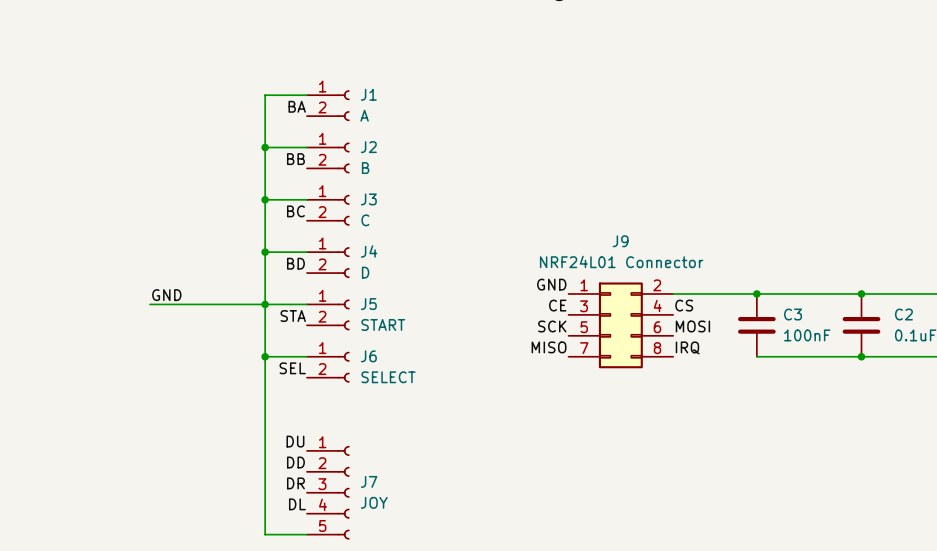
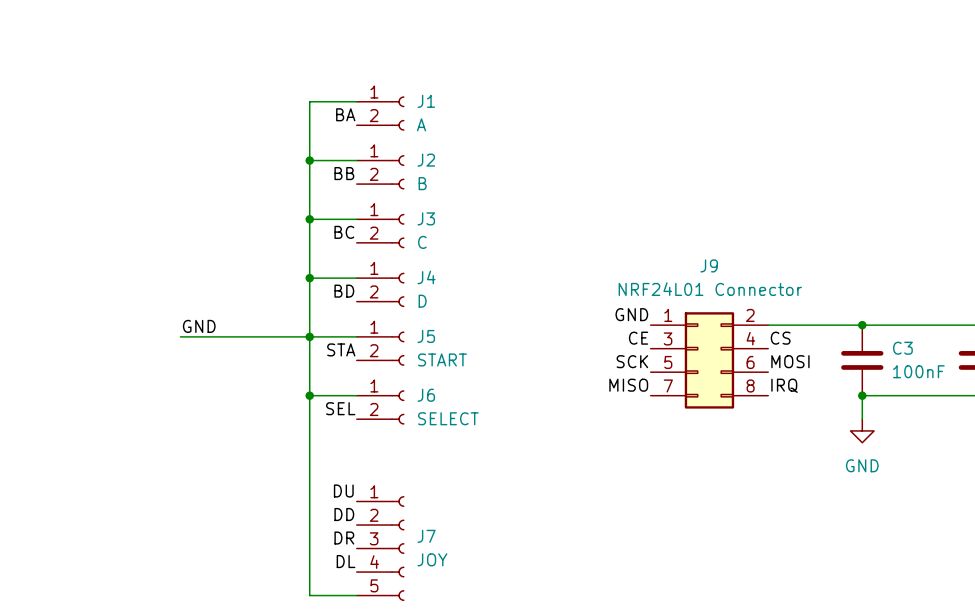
wire: none -> (862, 395) (862, 419)
junction: none -> (862, 395)
power symbol: none -> GND (862, 430)

